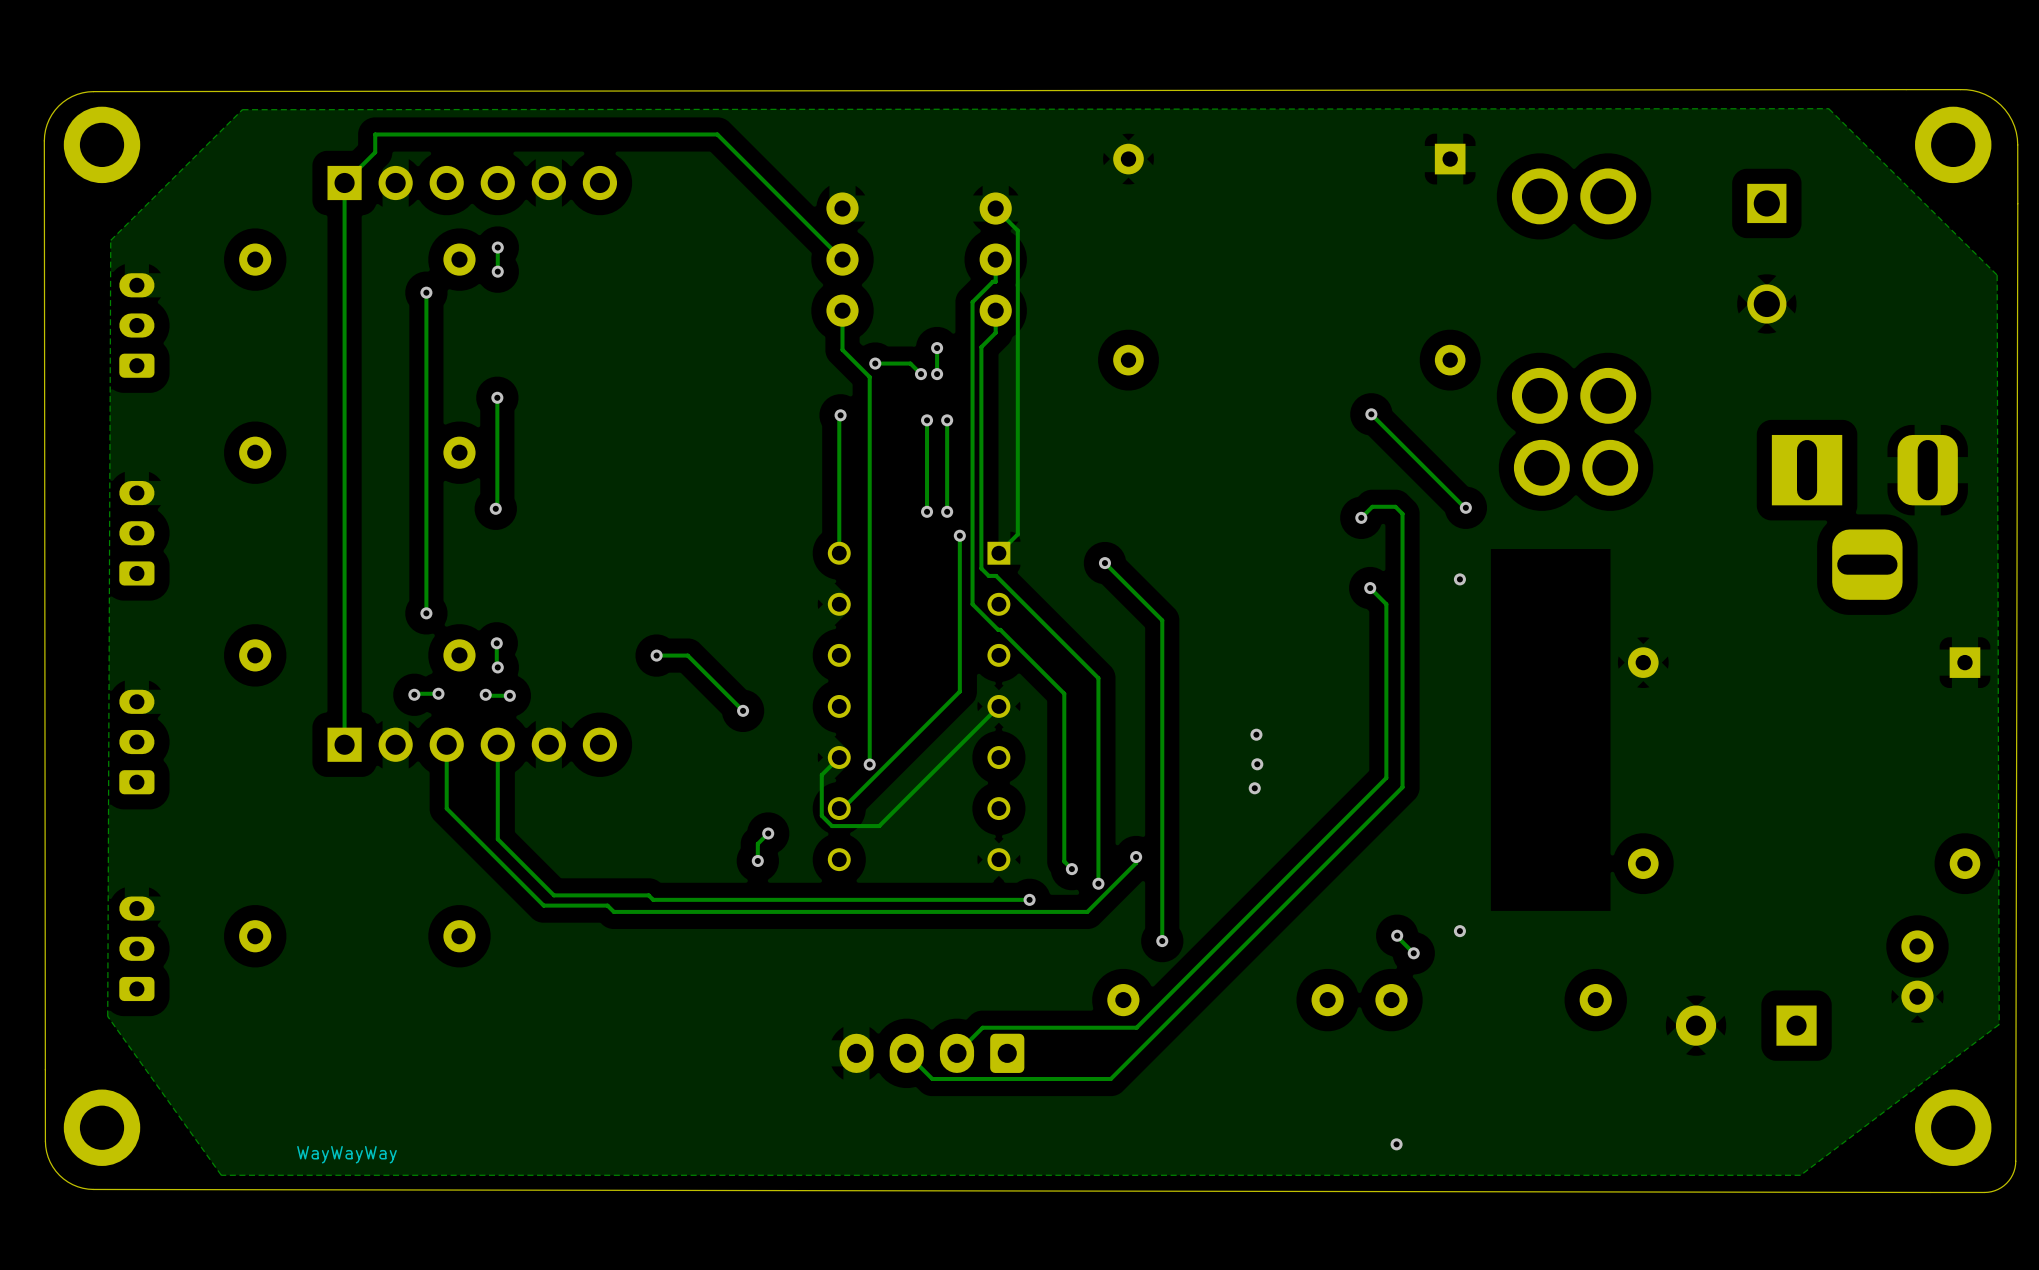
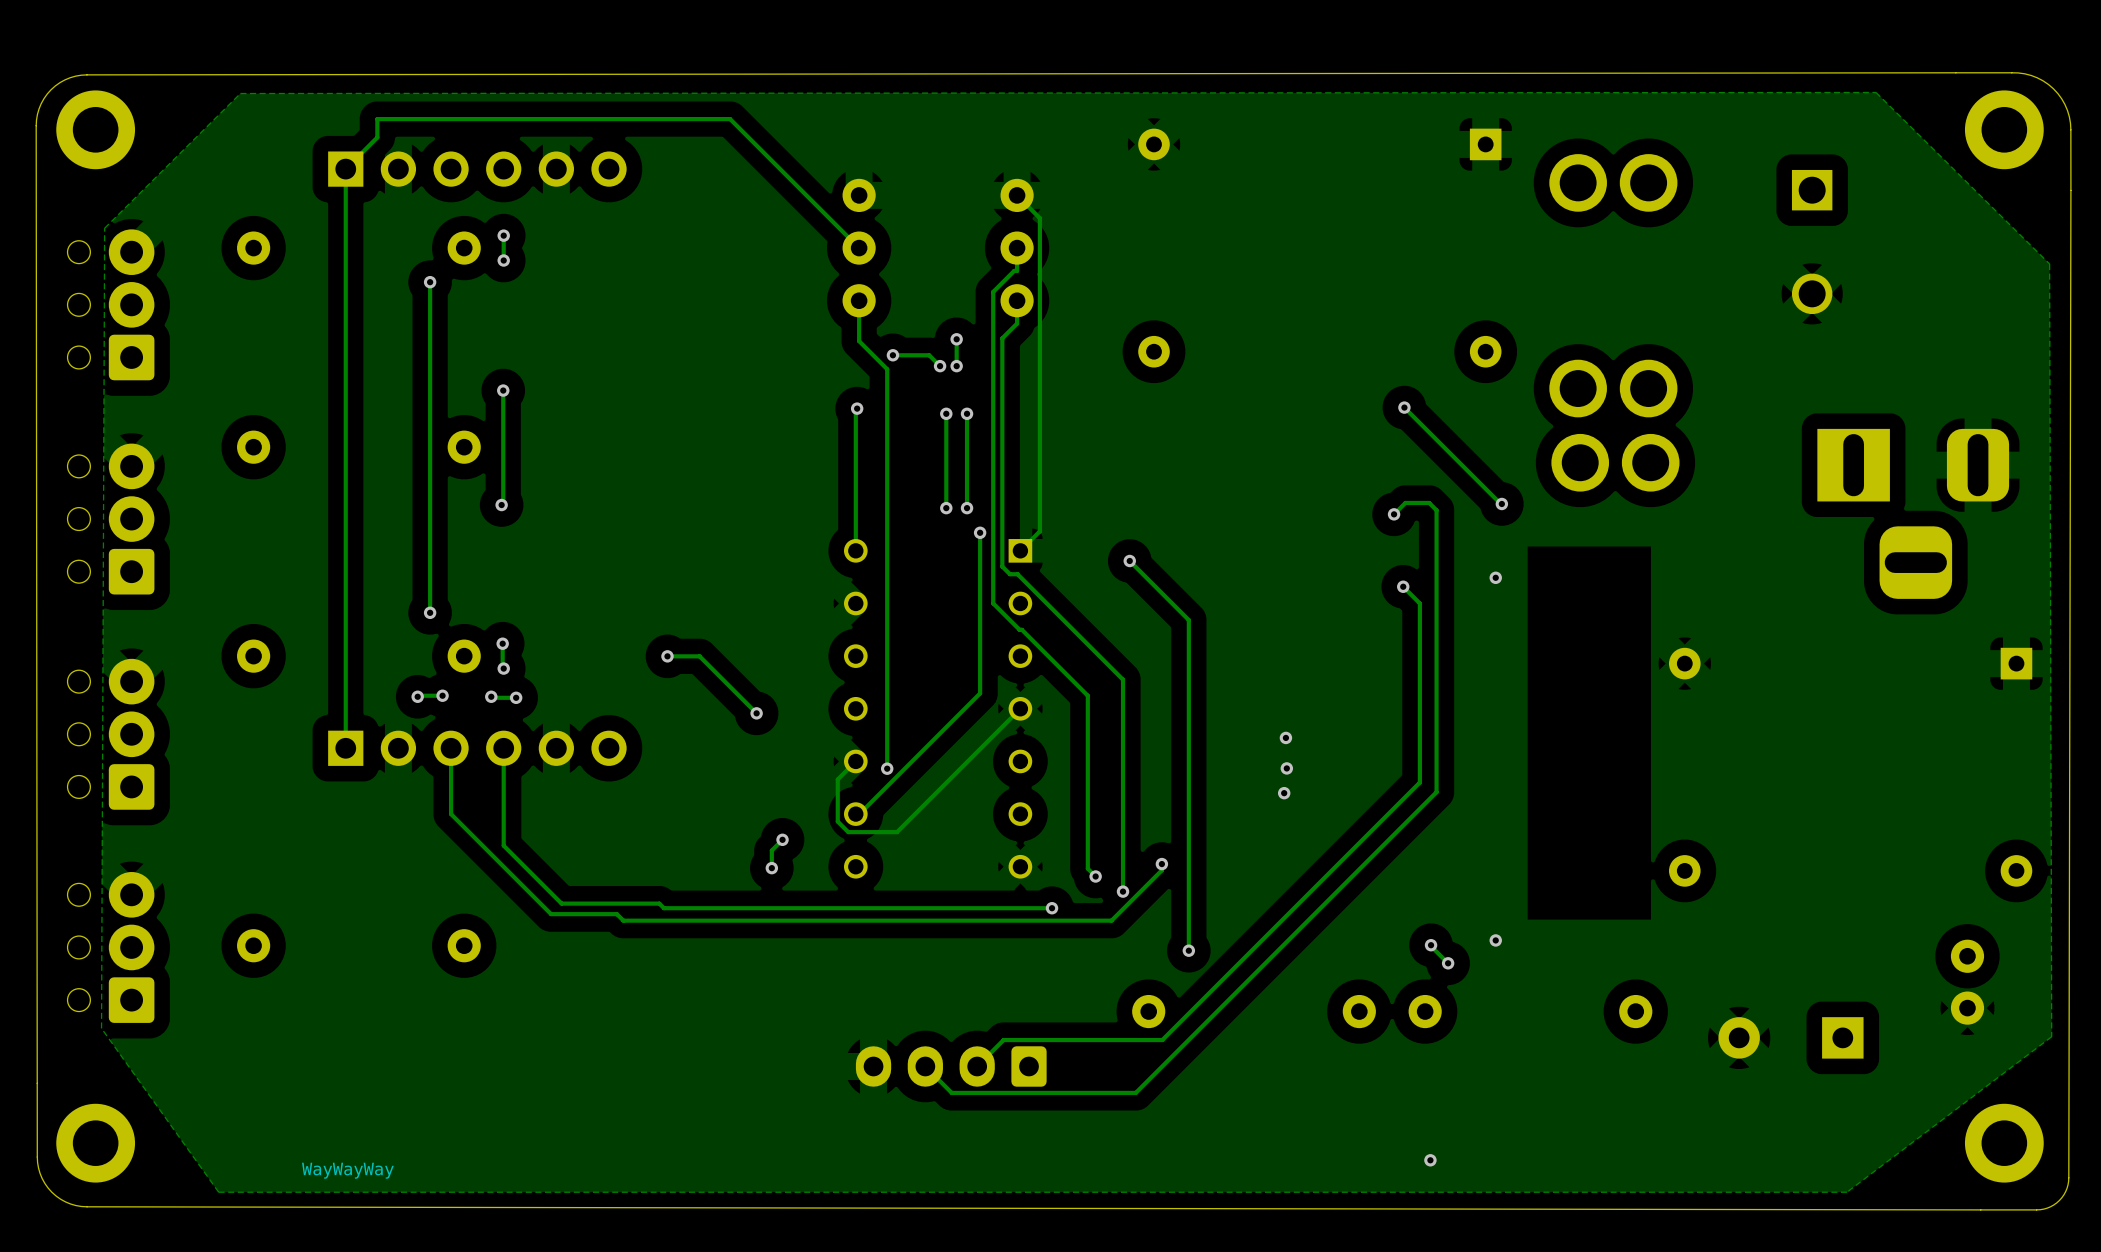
part: none -> (110, 304)
part: (136, 325) -> none
part: none -> (110, 519)
part: (136, 533) -> none
part: none -> (110, 734)
part: (136, 742) -> none
part: none -> (110, 947)
part: (136, 948) -> none

